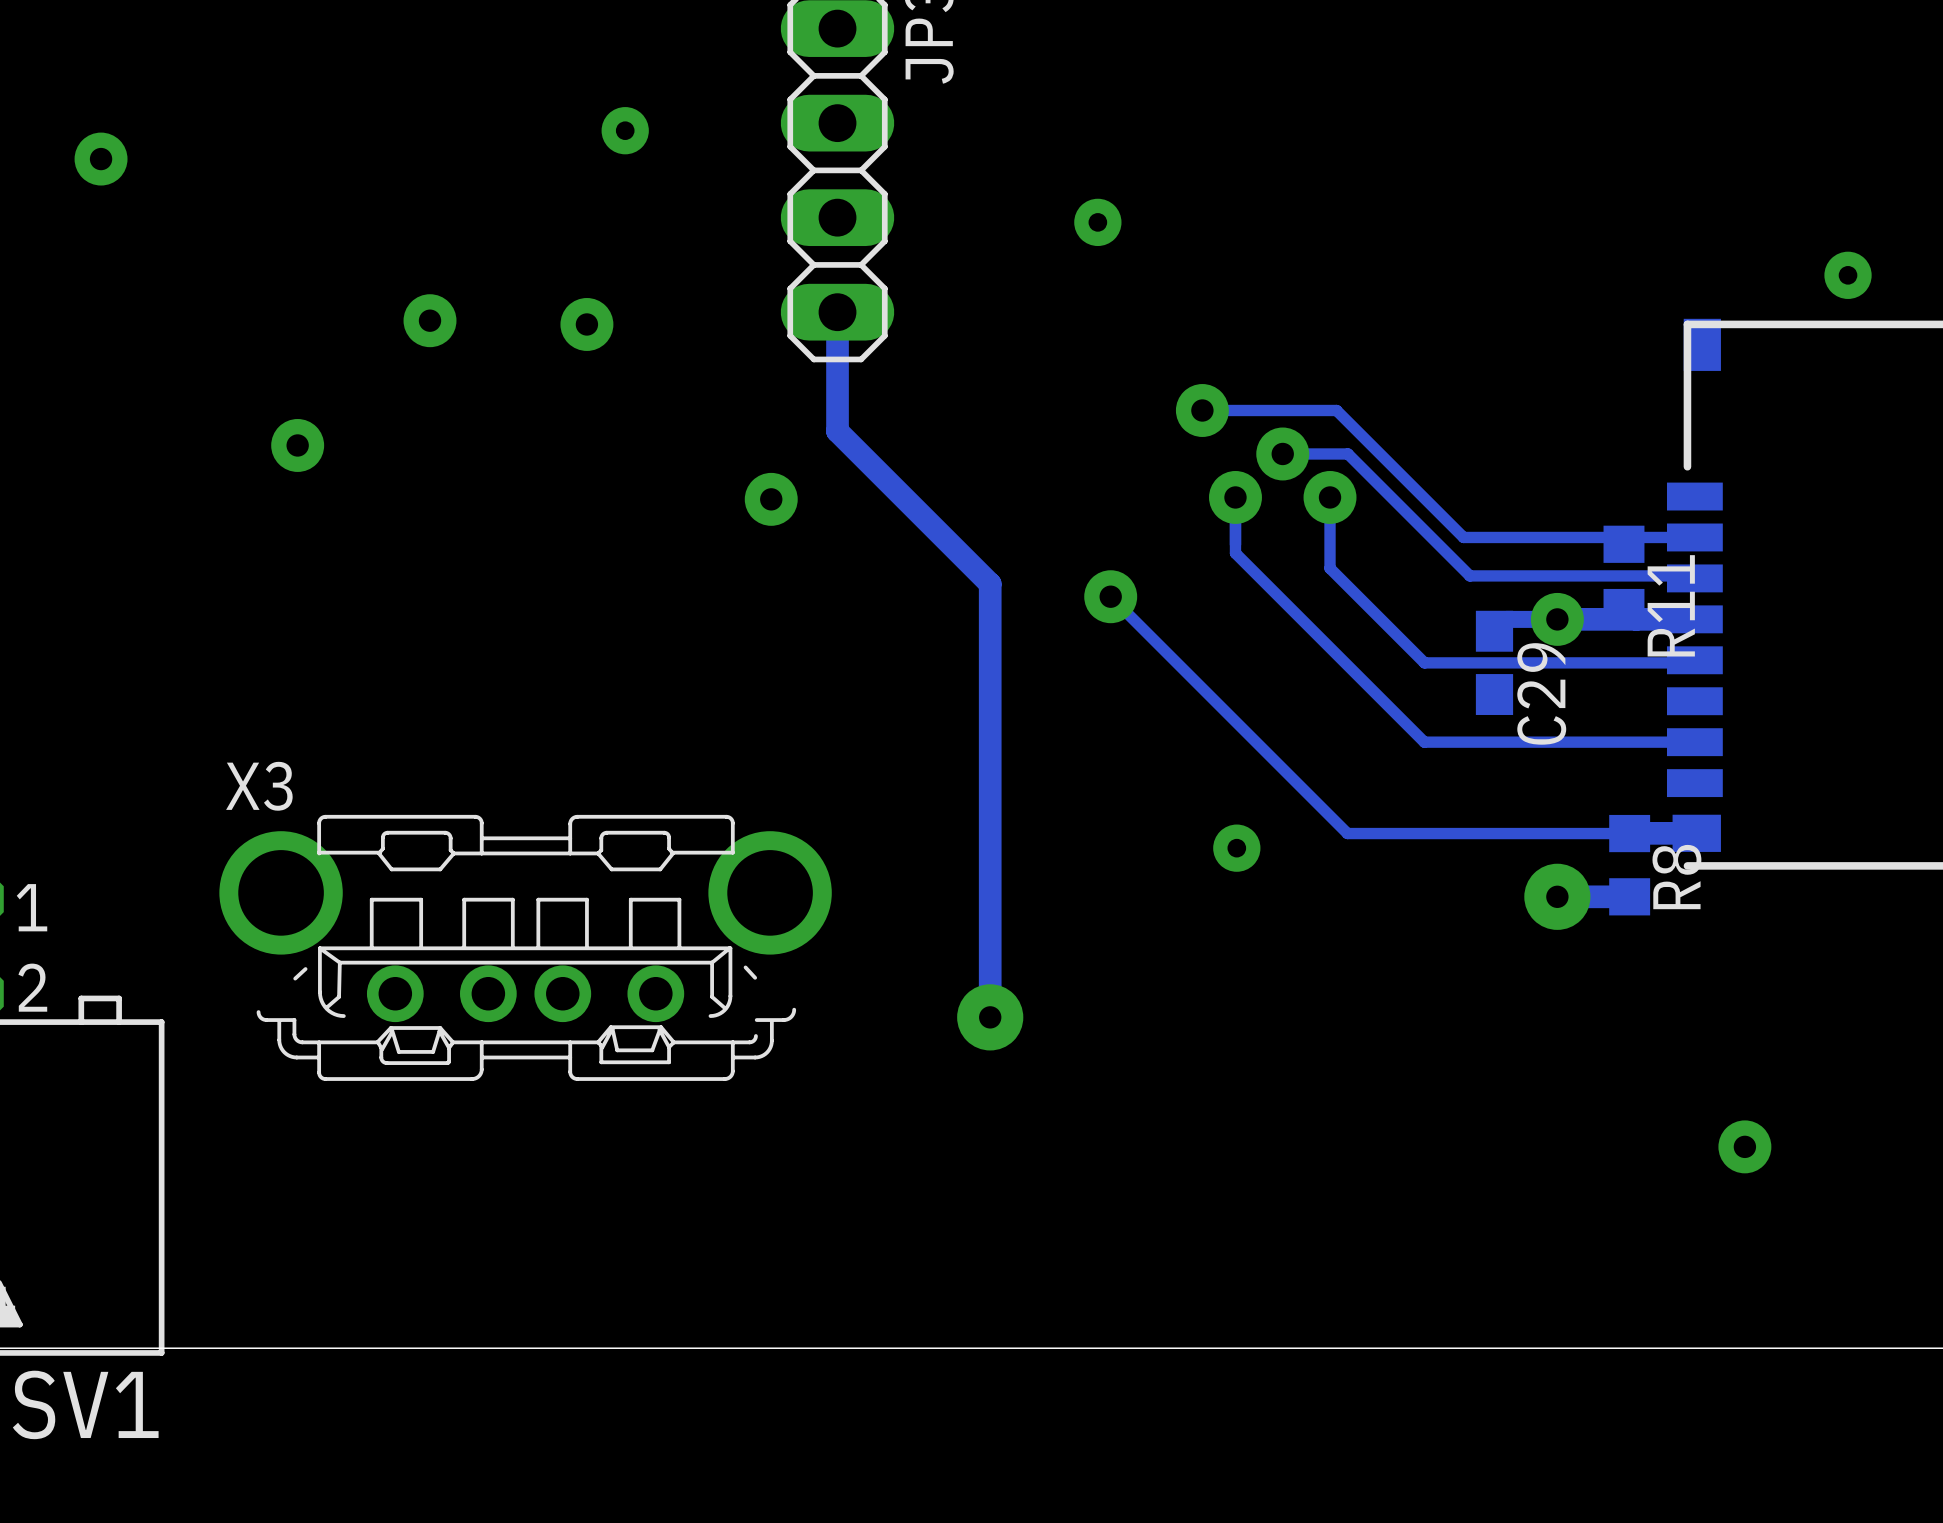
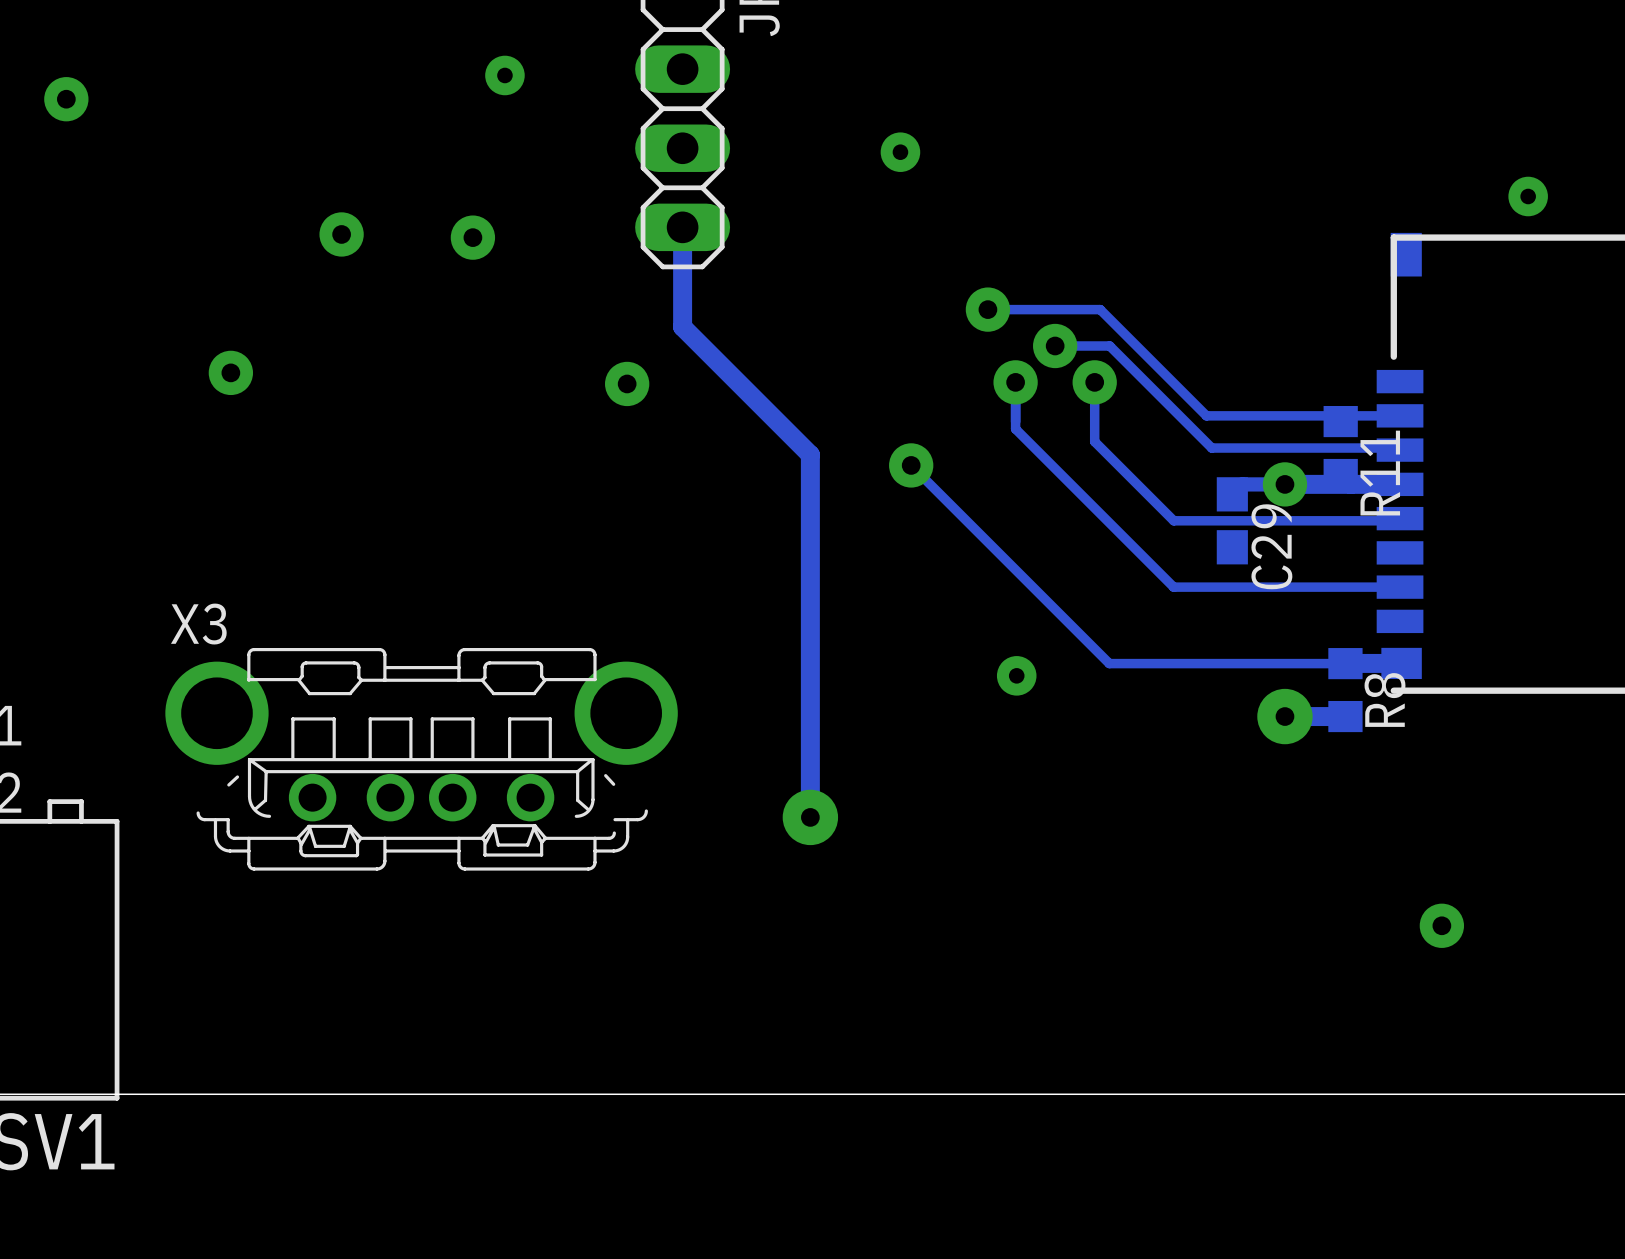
via position: (297, 445) -> (230, 372)

